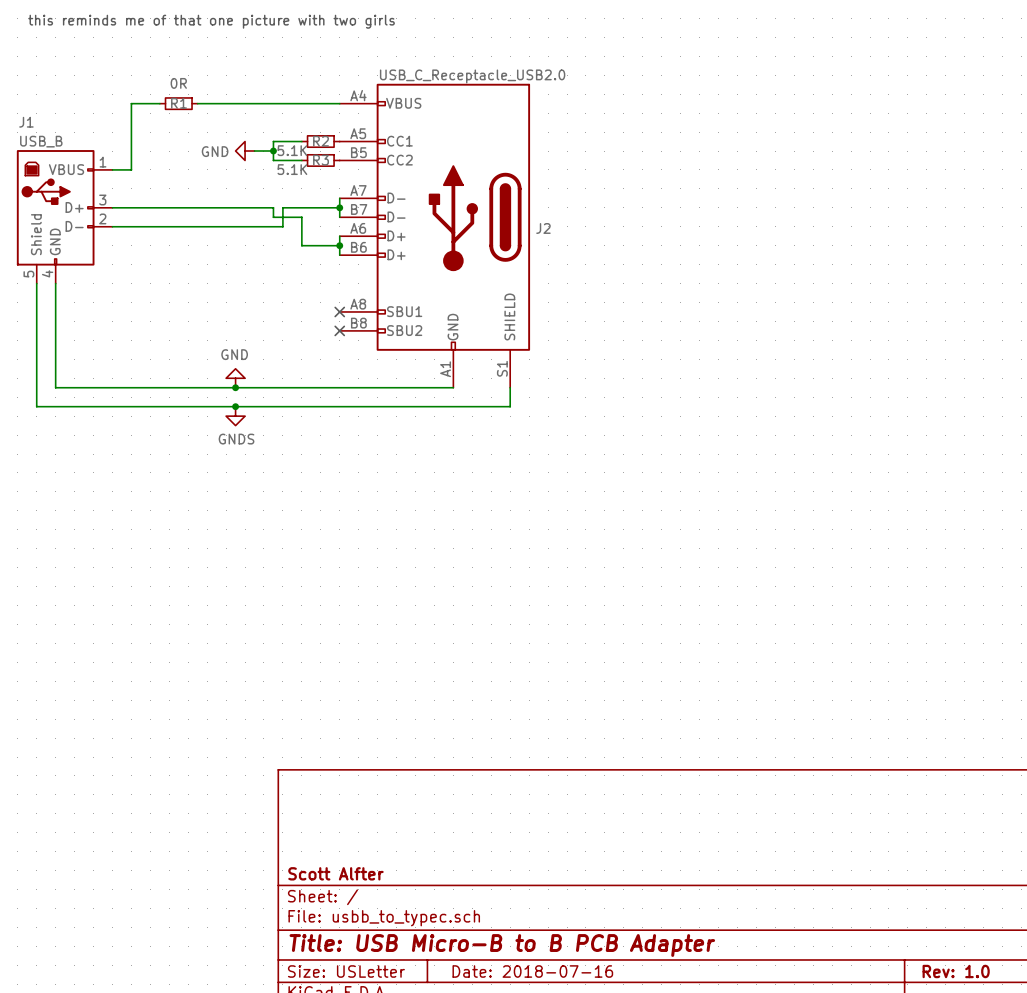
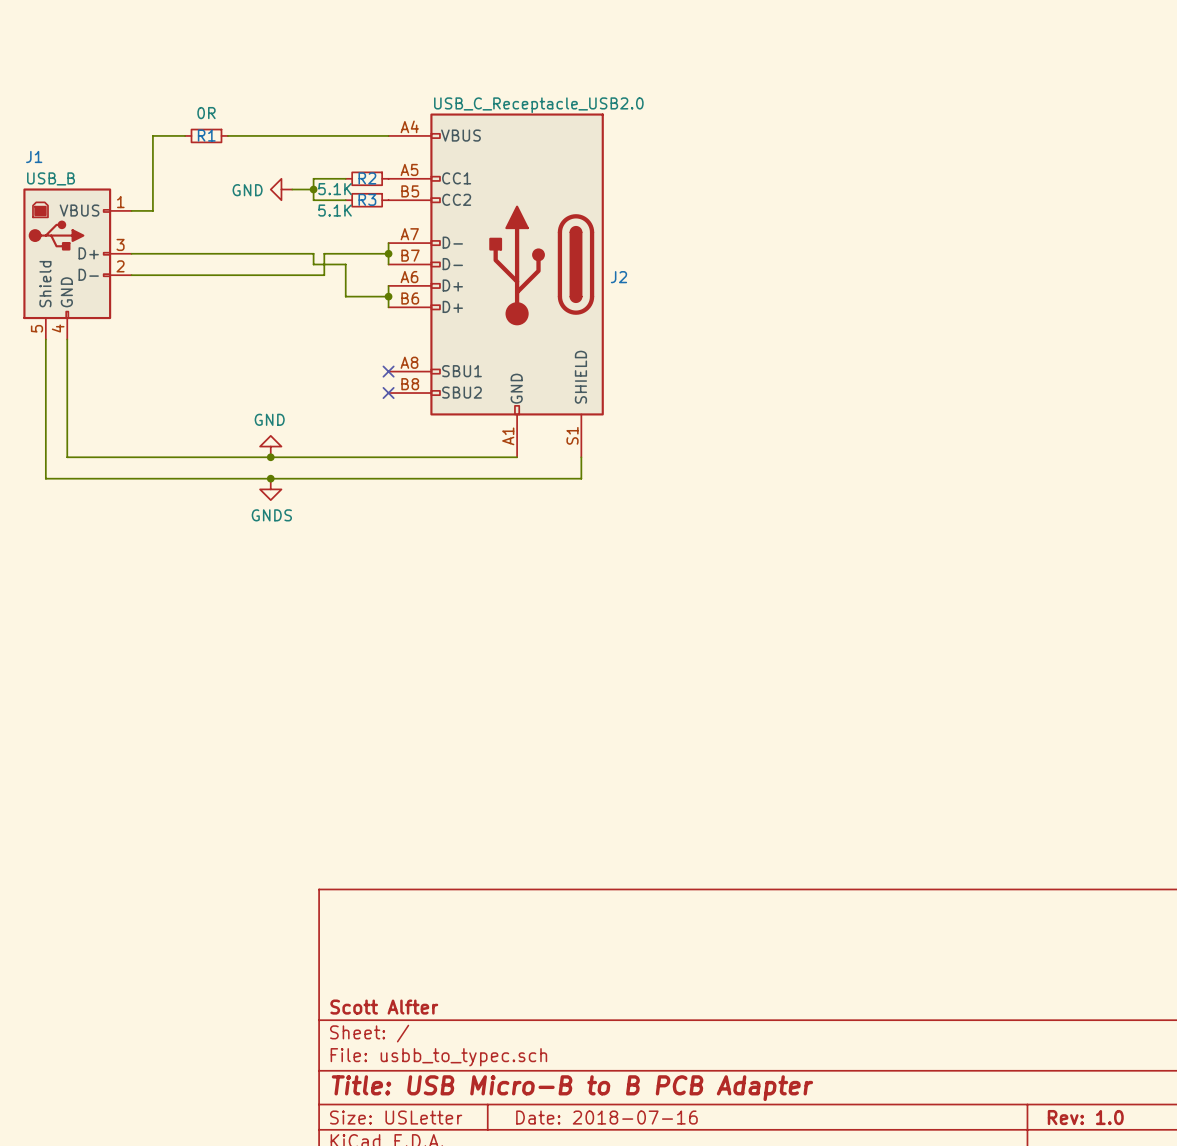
text: this reminds me of that one picture with two girls (211, 21) -> none

